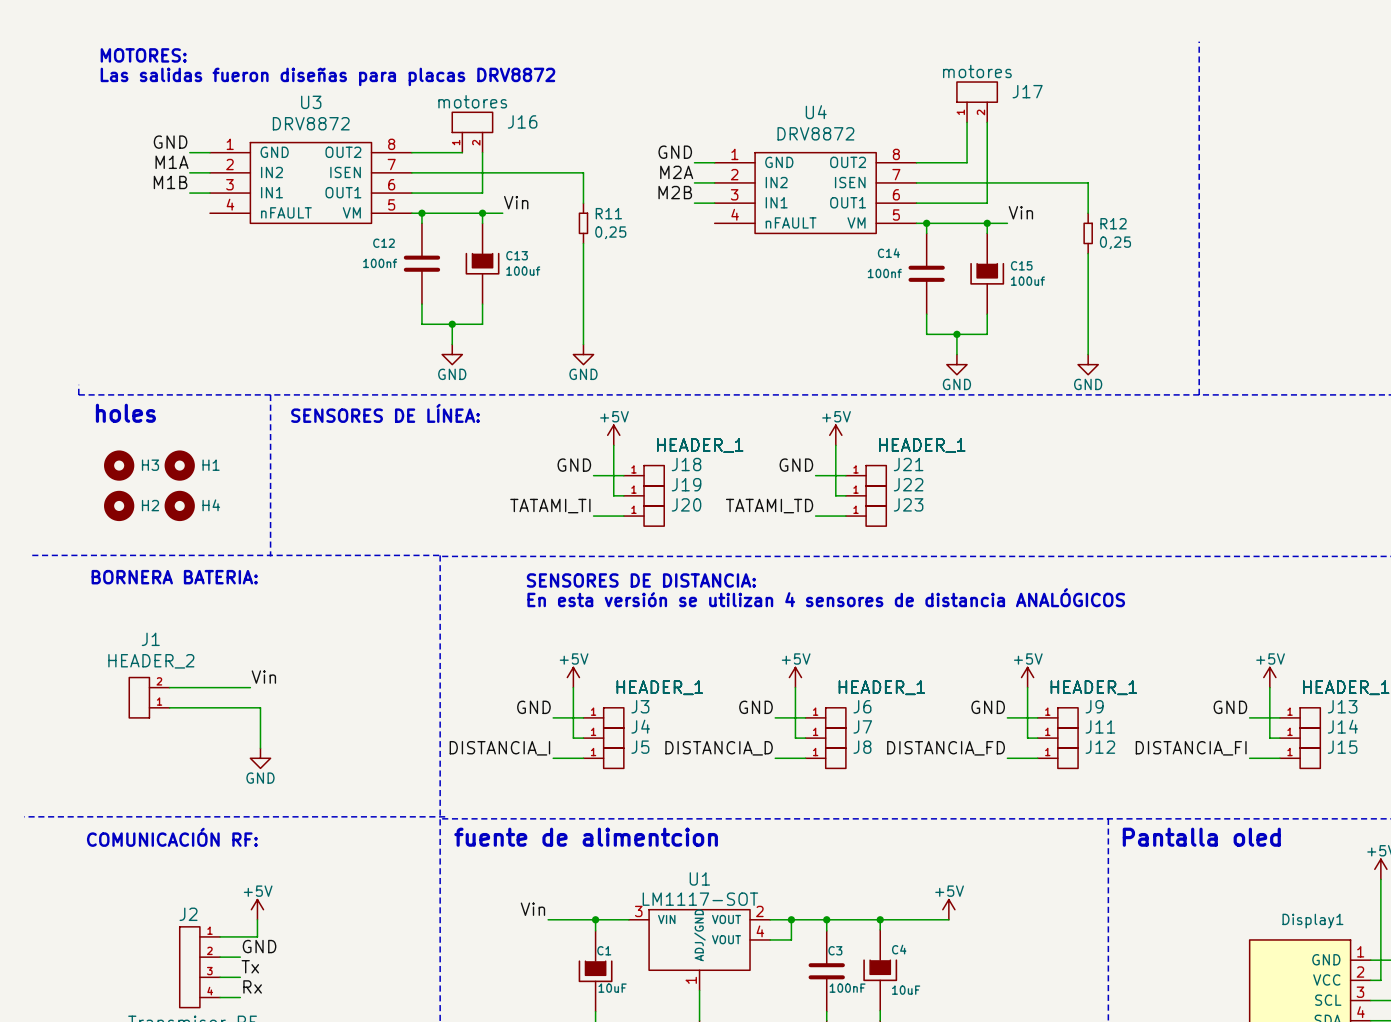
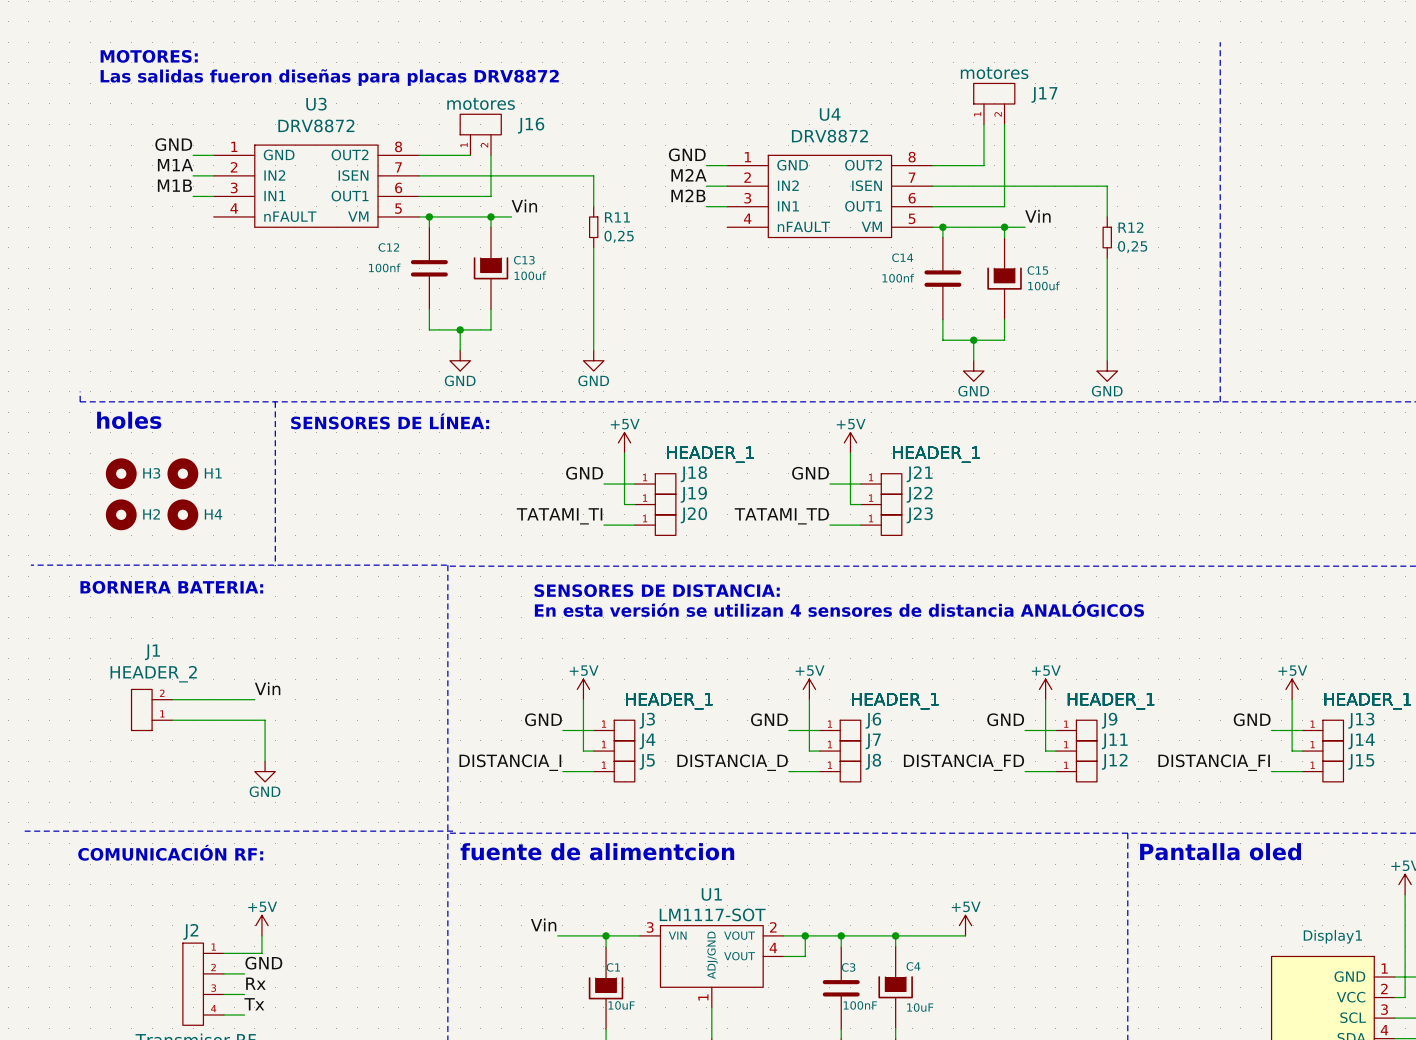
label: Tx (250, 966) -> Rx (255, 983)
label: Rx (252, 986) -> Tx (254, 1004)

